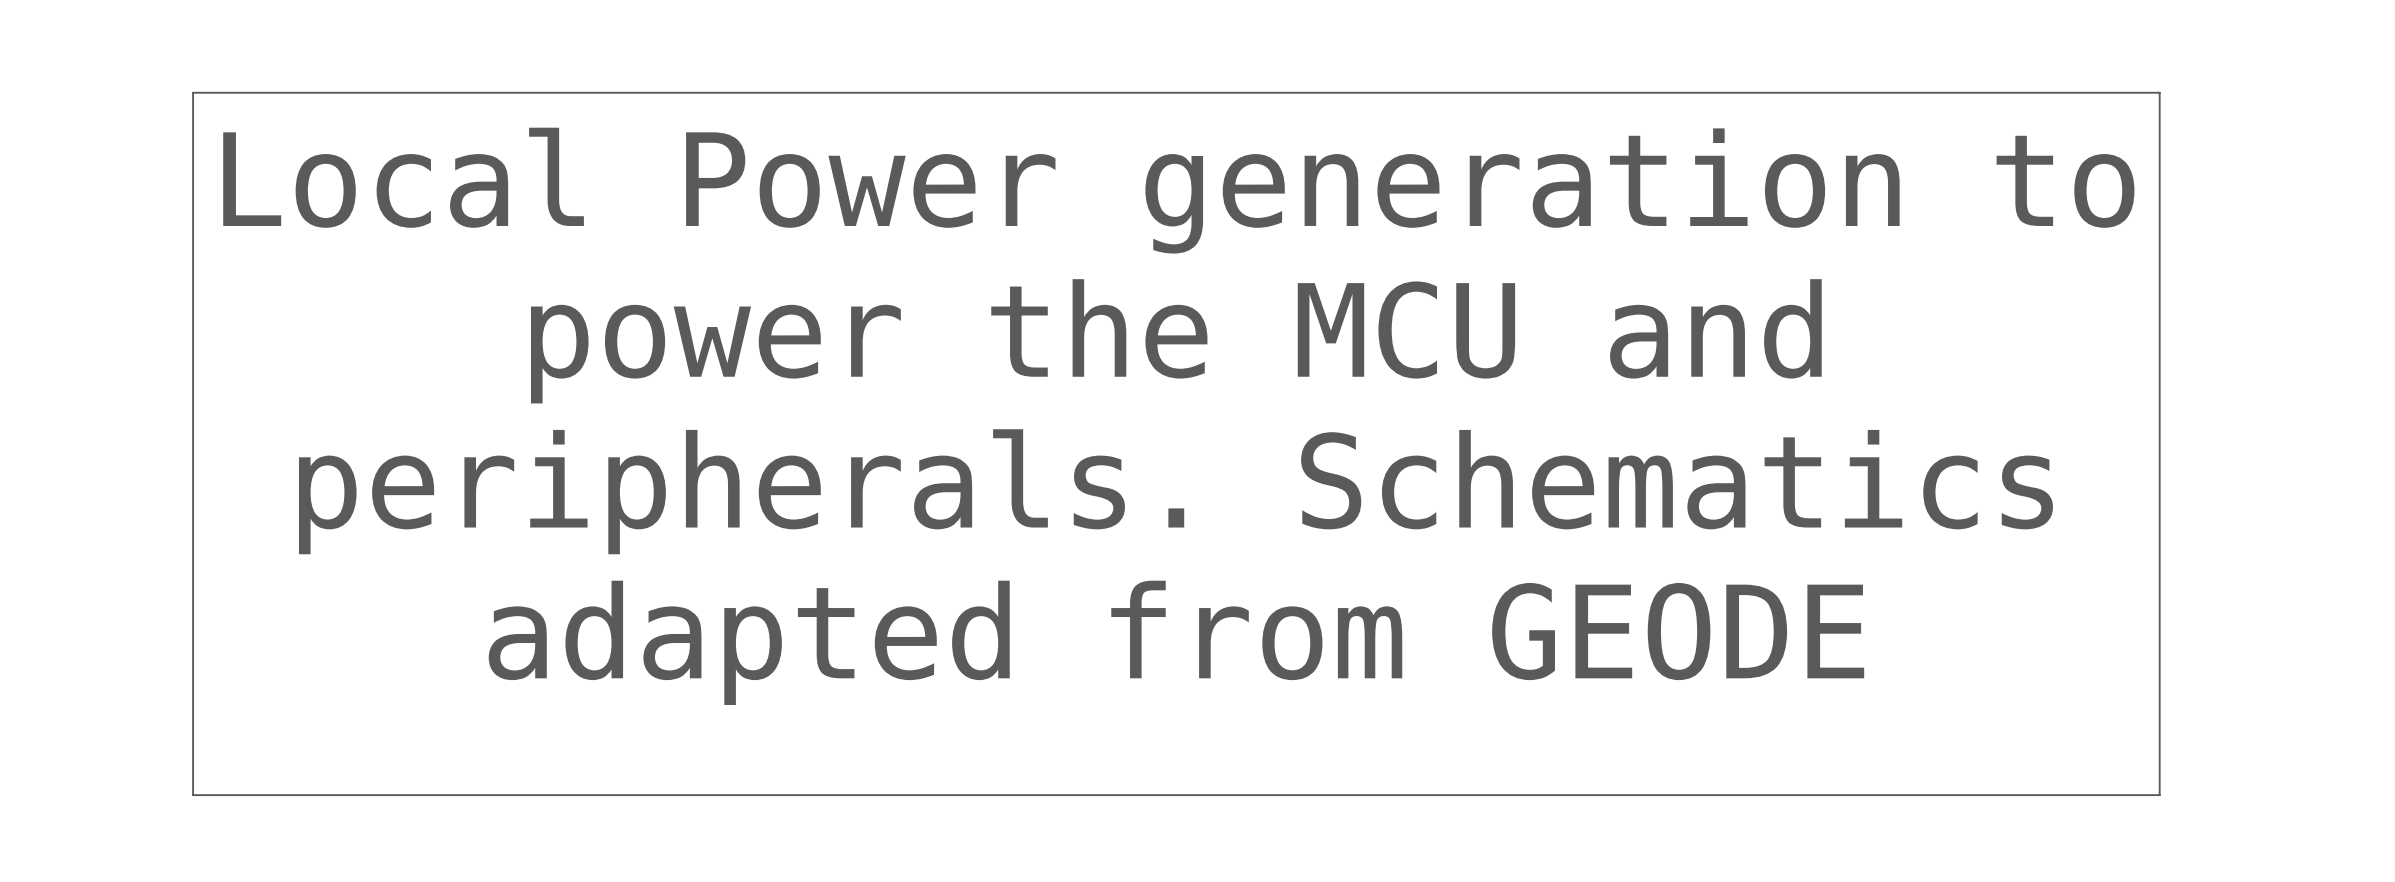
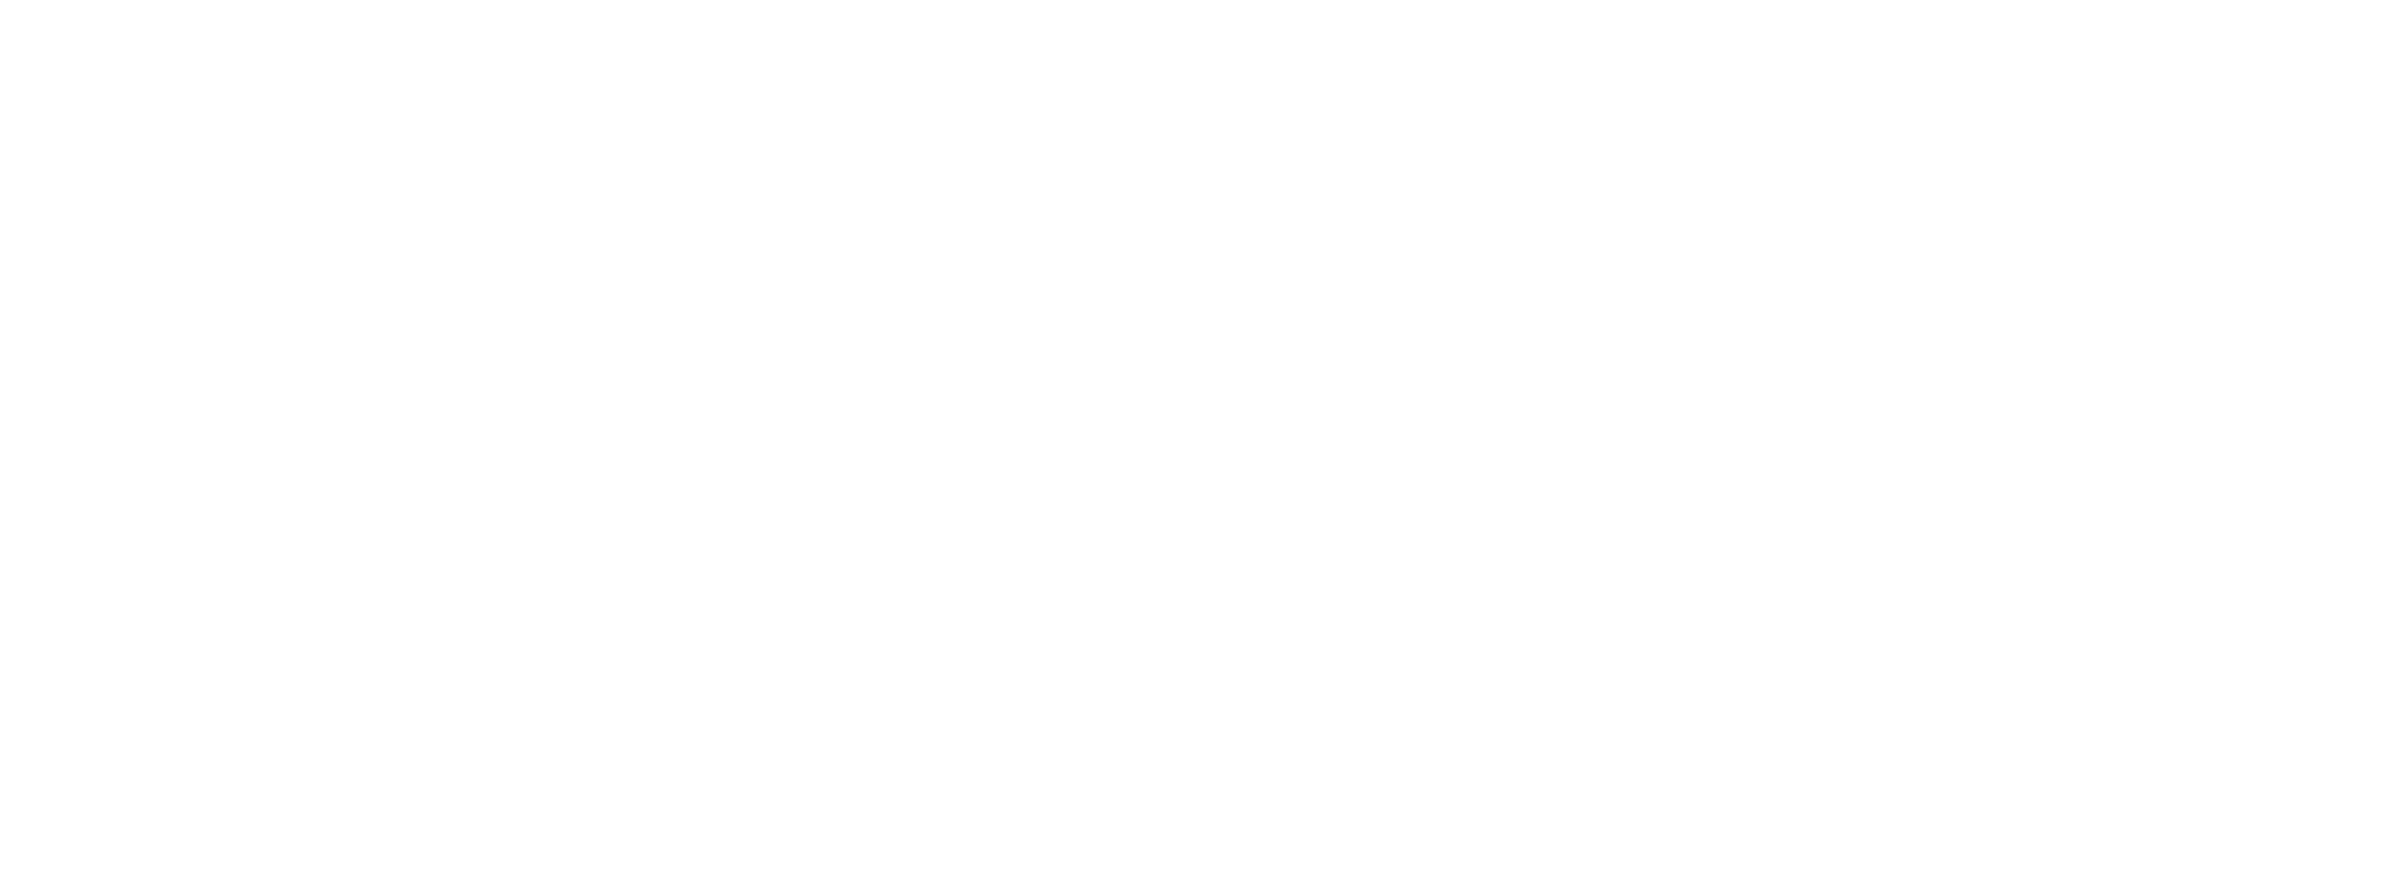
line: (193, 92) (2159, 92) (2159, 795) (193, 795) (193, 92) -> none
text: Local Power generation to (1178, 190) -> none
text: power the MCU and (1176, 341) -> none
text: peripherals. Schematics (1175, 491) -> none
text: adapted from GEODE (1176, 642) -> none

